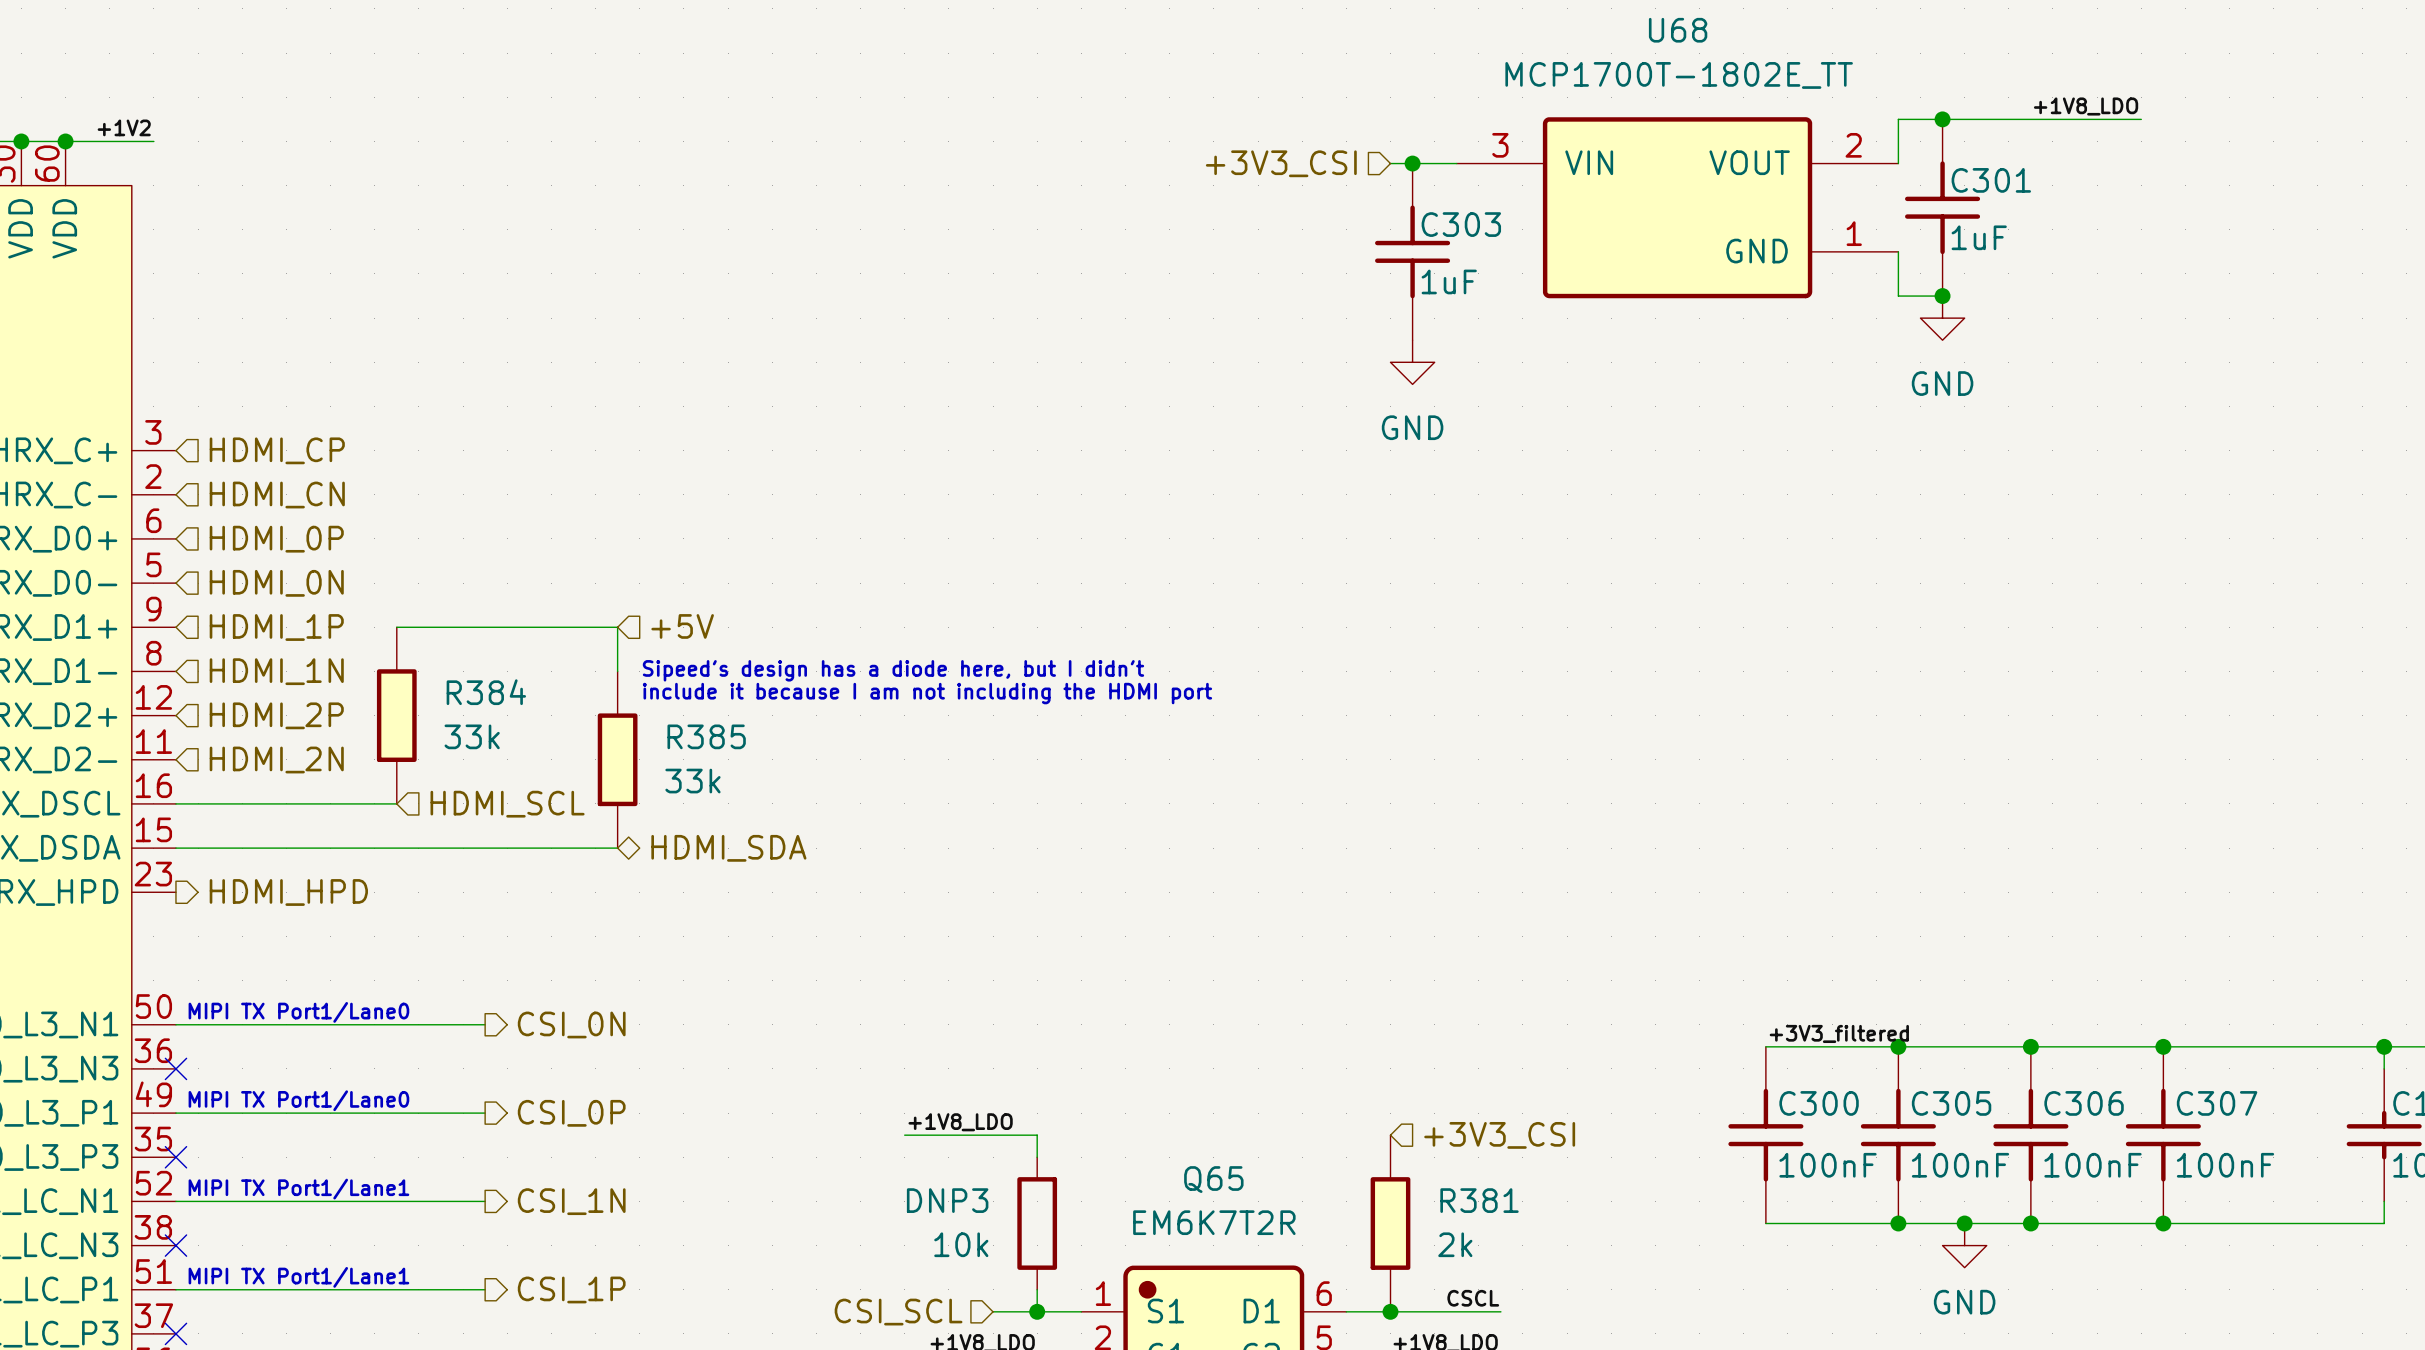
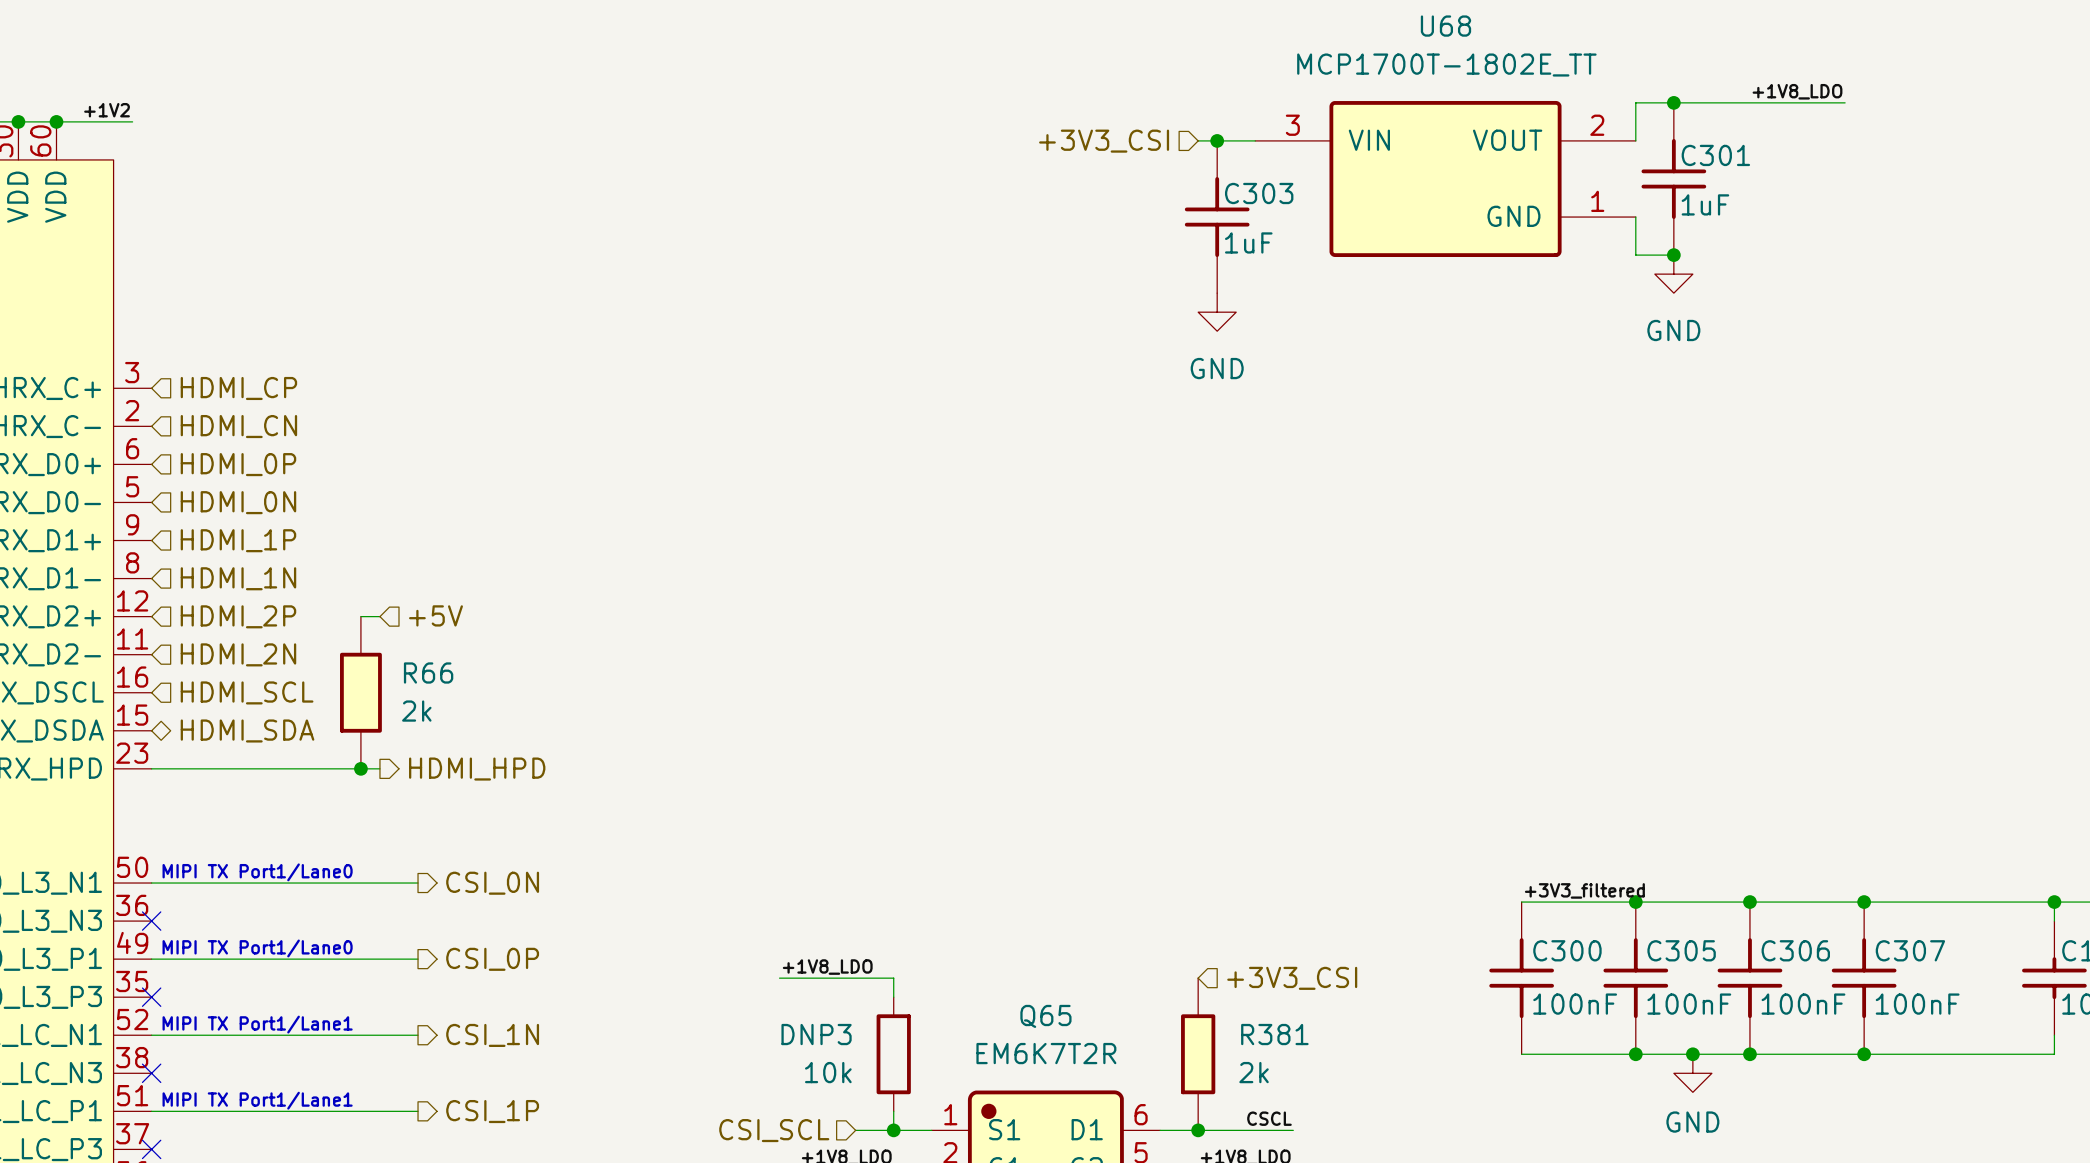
hierarchical label position: +5V (682, 626) -> +5V (435, 615)
wire: (396, 627) (617, 627) (617, 671) -> none
text: Sipeed's design has a diode here, but I didn't (893, 670) -> none
text: include it because I am not including the HDMI port (927, 693) -> none
R384: 33k (396, 715) -> none
wire: none -> (360, 616) (379, 616)
R385: 33k (617, 759) -> none
wire: (175, 803) (396, 803) -> none
R66: none -> 2k (360, 692)
hierarchical label position: HDMI_SCL (507, 804) -> HDMI_SCL (247, 692)
wire: (175, 848) (617, 848) -> none
hierarchical label: none -> HDMI_SDA (247, 730)
hierarchical label: HDMI_SDA (728, 848) -> none
wire: none -> (151, 768) (379, 768)
hierarchical label position: HDMI_HPD (288, 892) -> HDMI_HPD (477, 769)
junction: none -> (360, 768)

